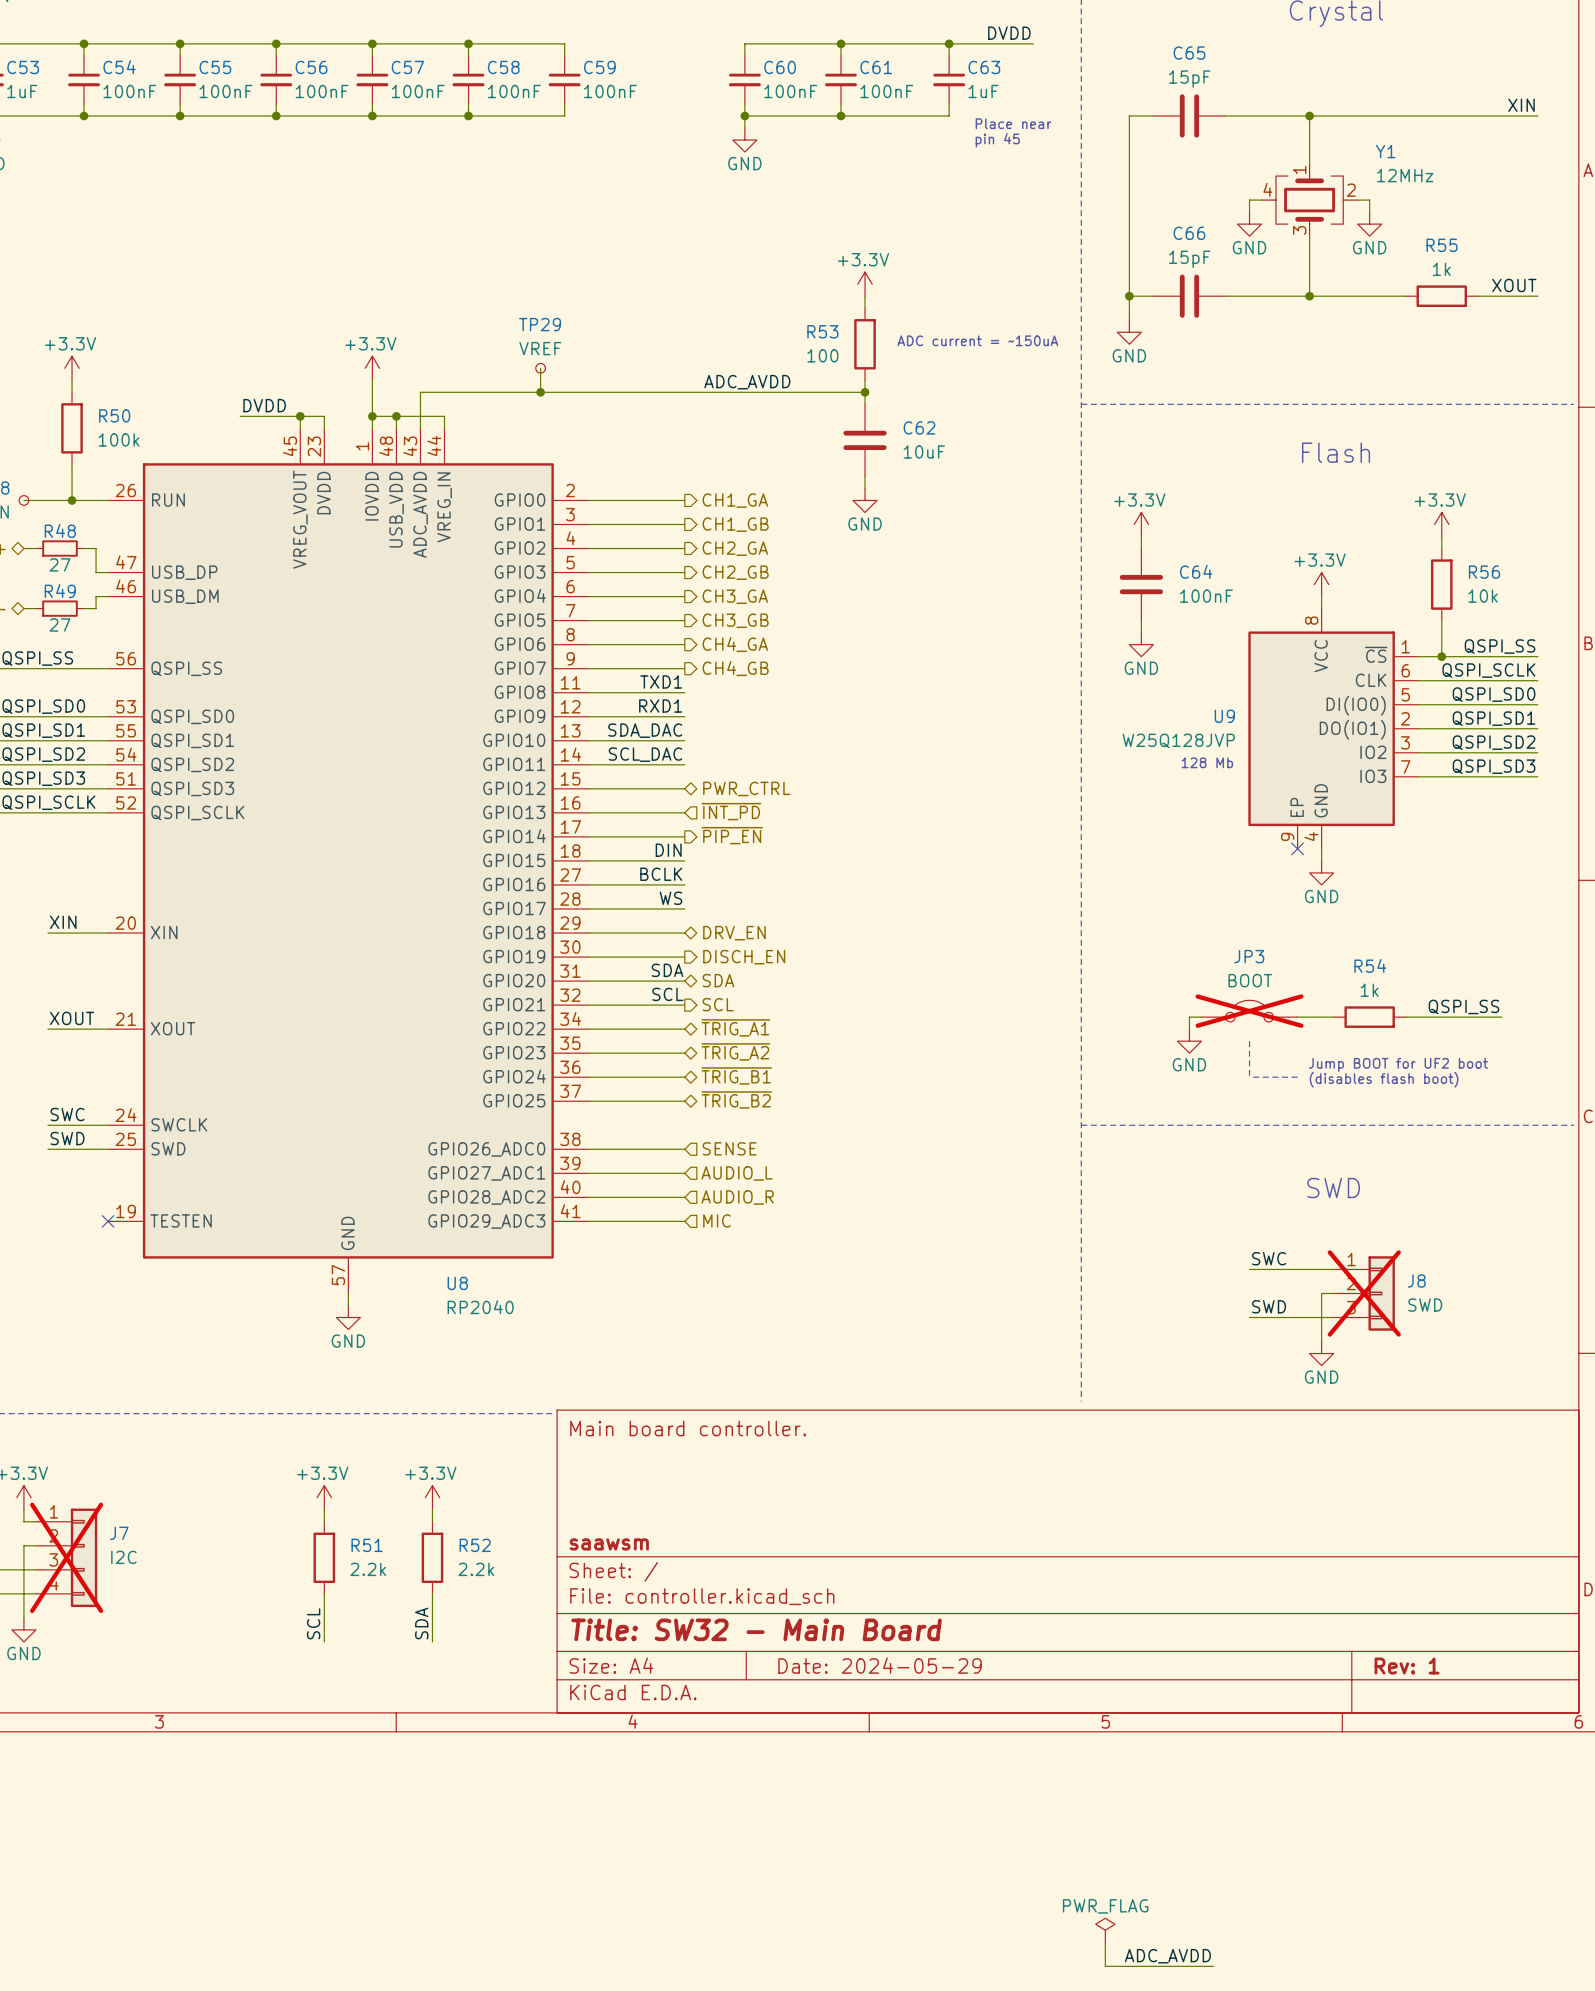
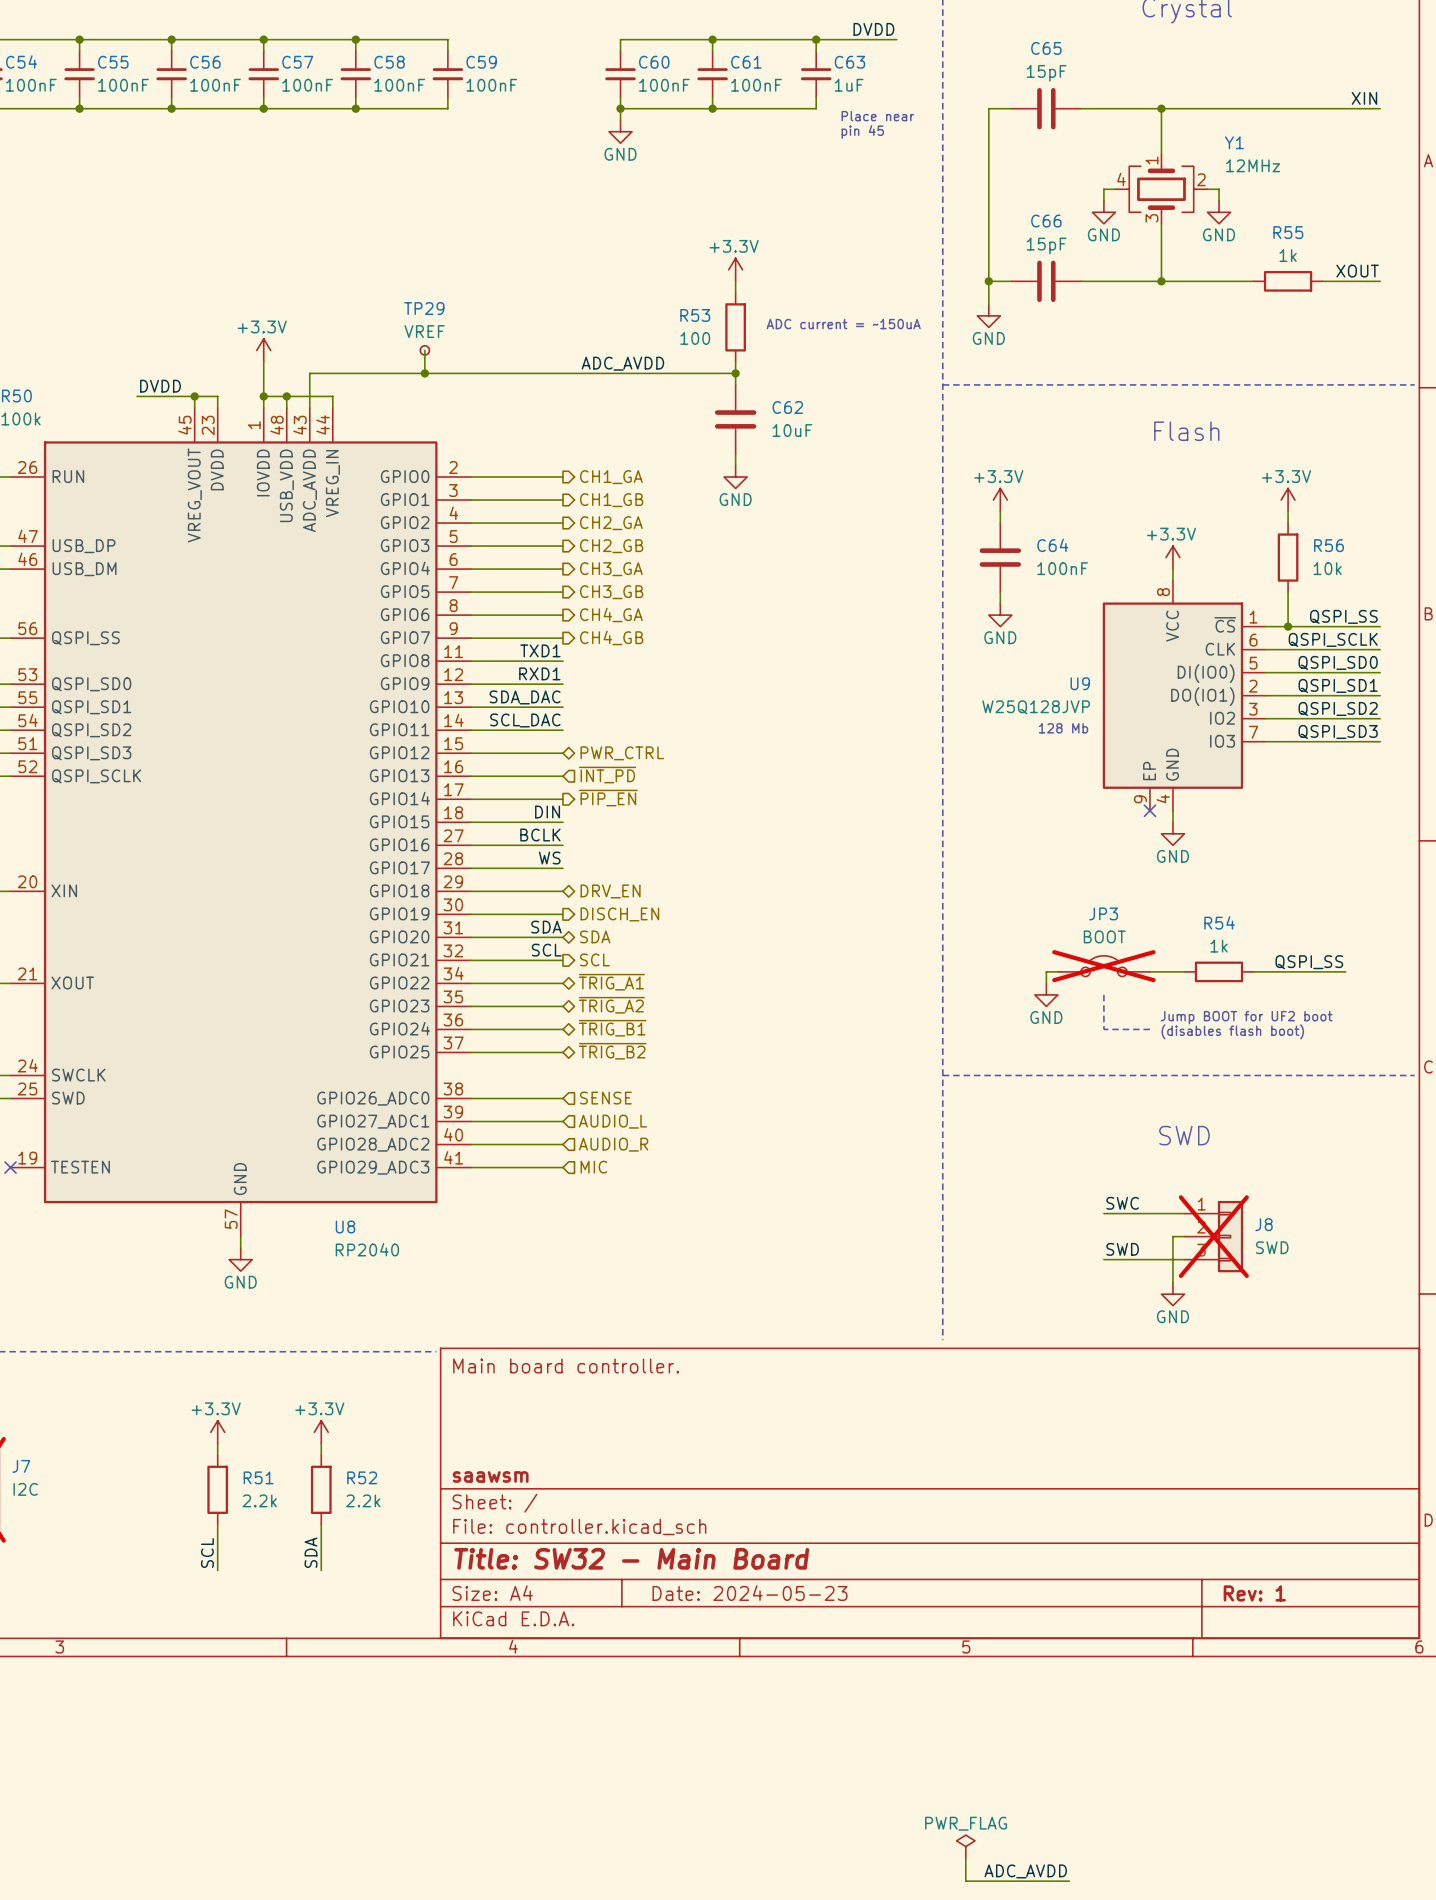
title block: Date: 2024-05-29 (880, 1665) -> Date: 2024-05-23 (749, 1593)

